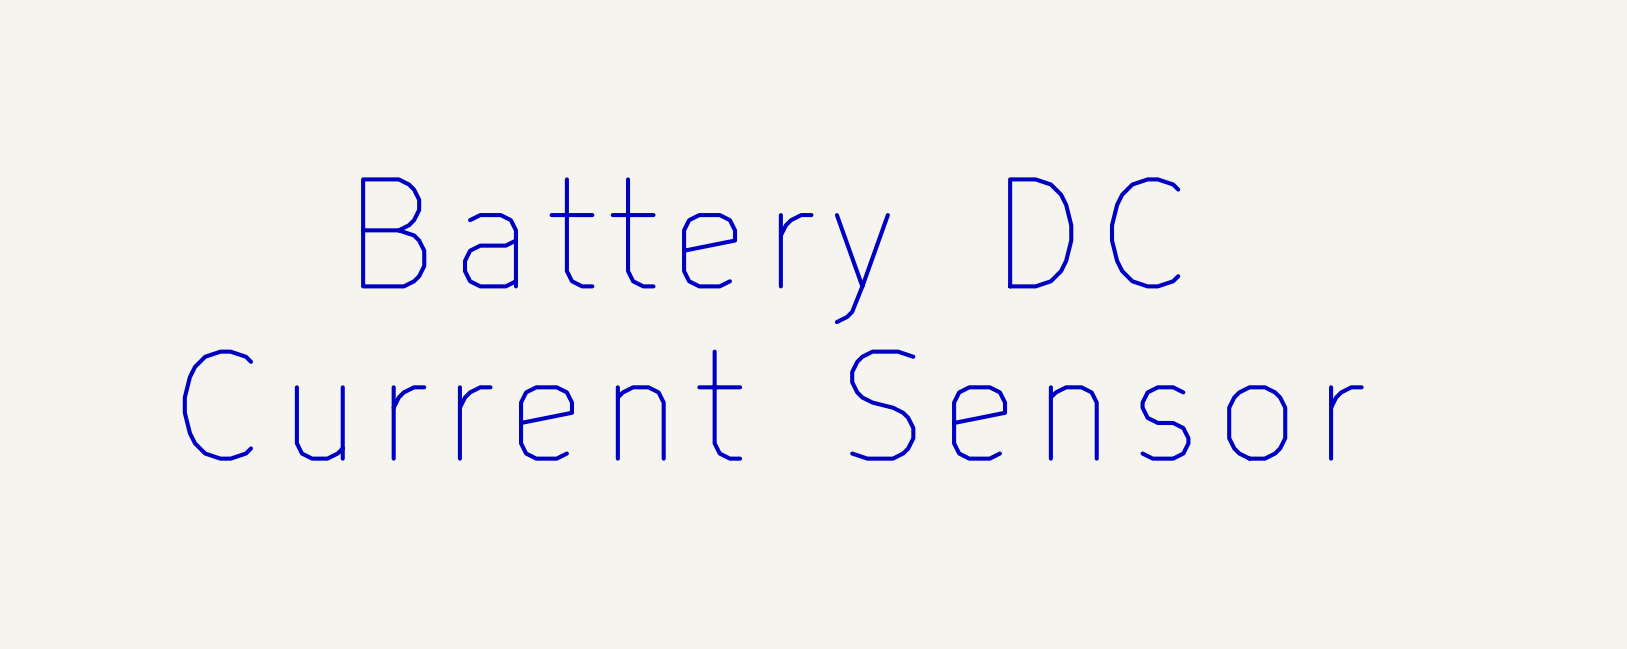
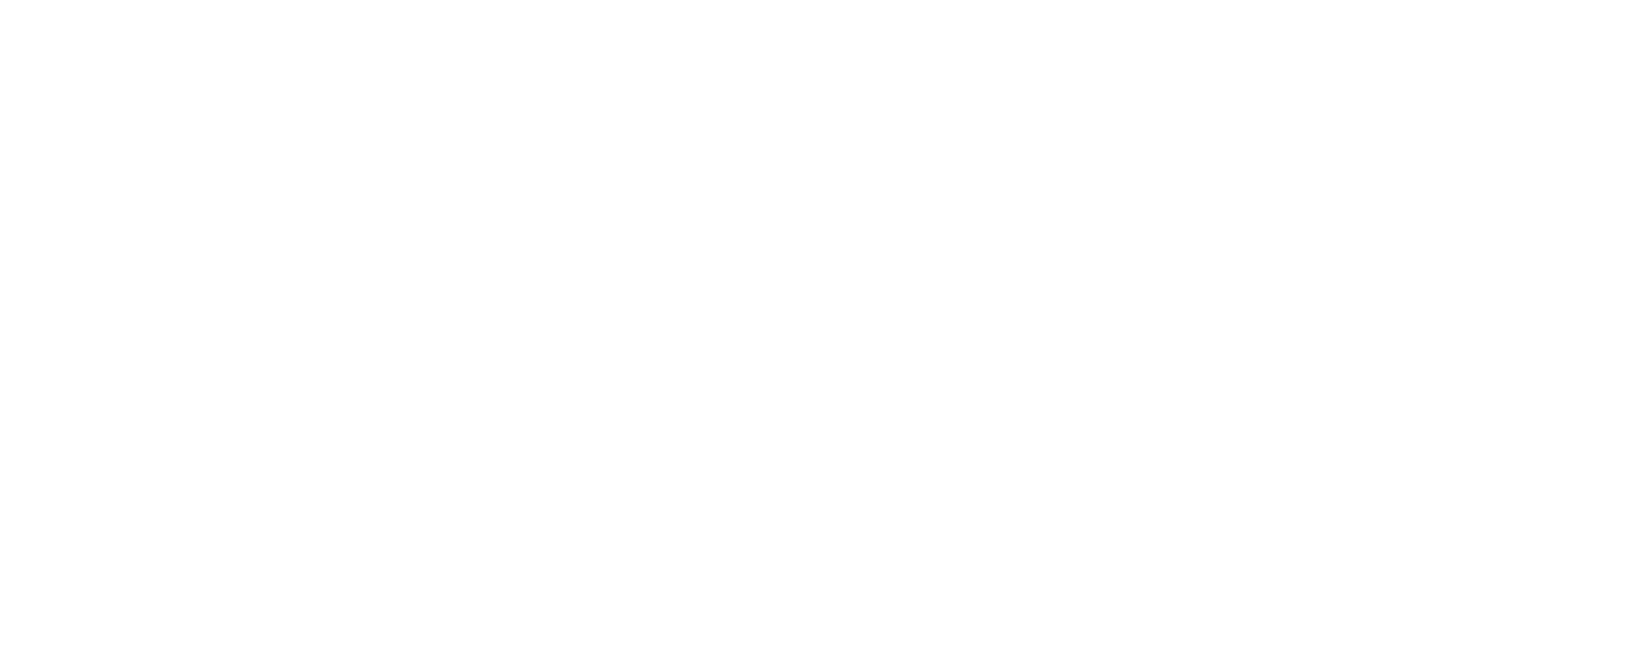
text: Battery DC (770, 250) -> none
text: Current Sensor (773, 405) -> none

